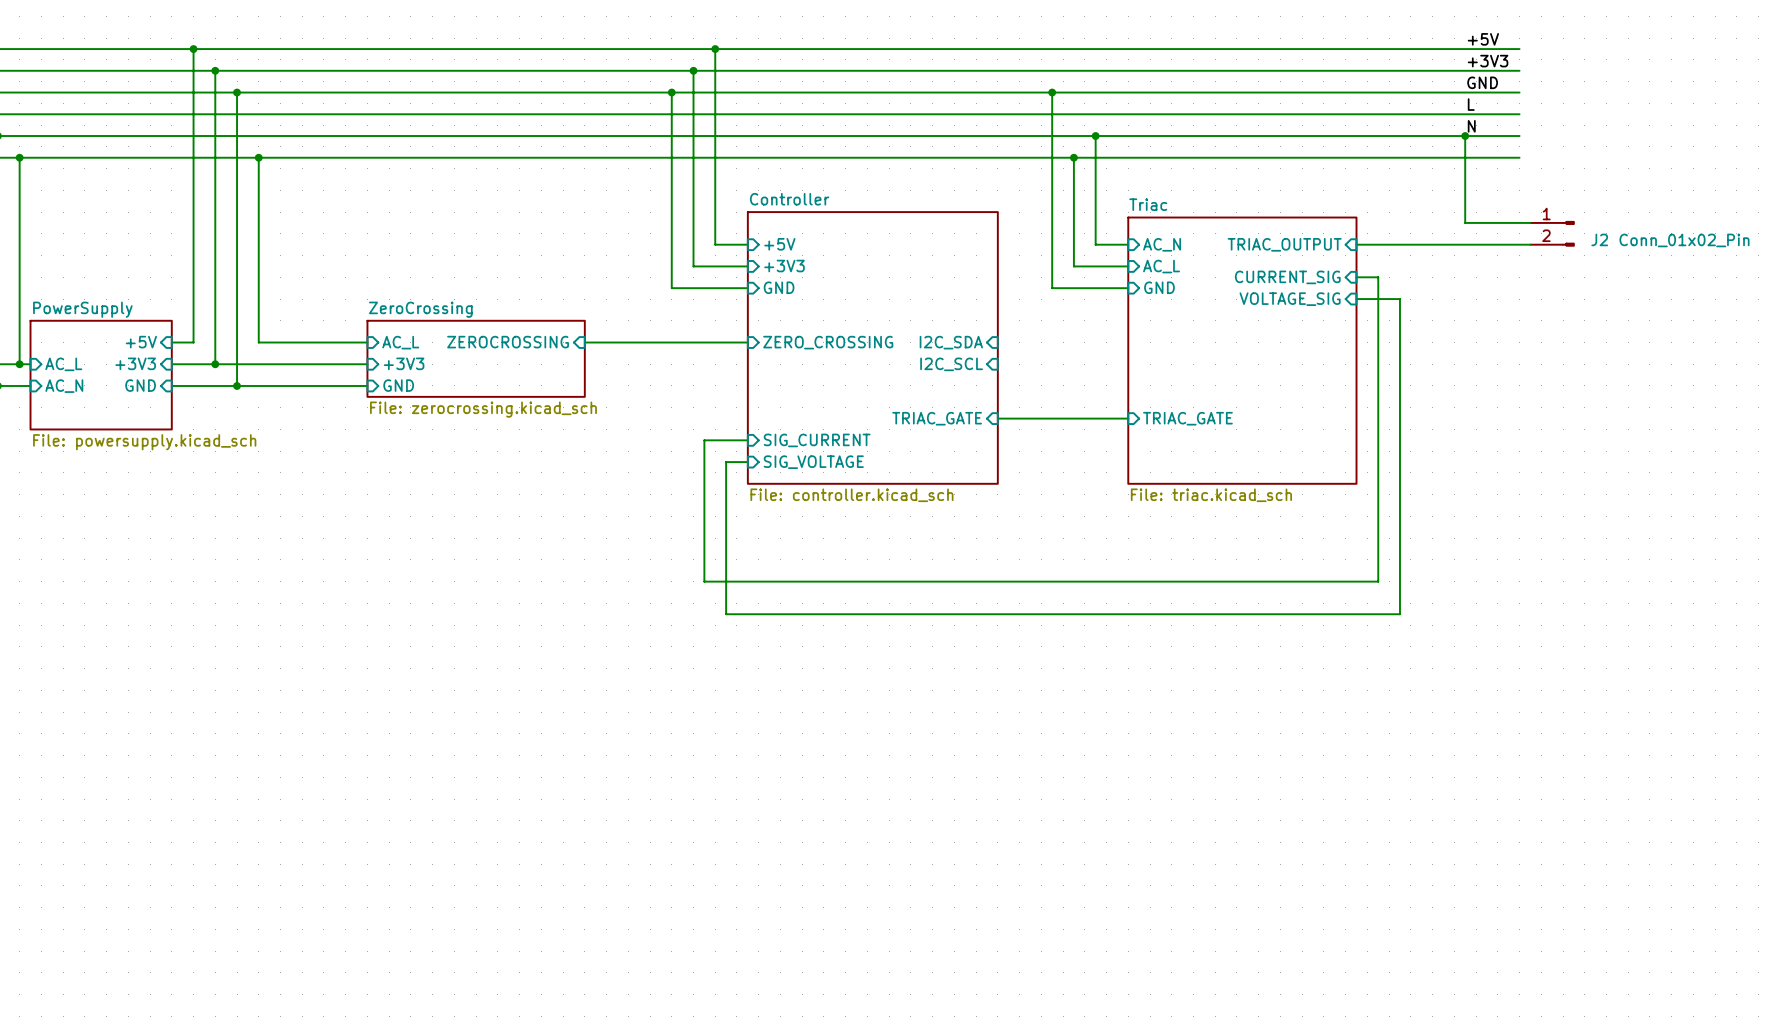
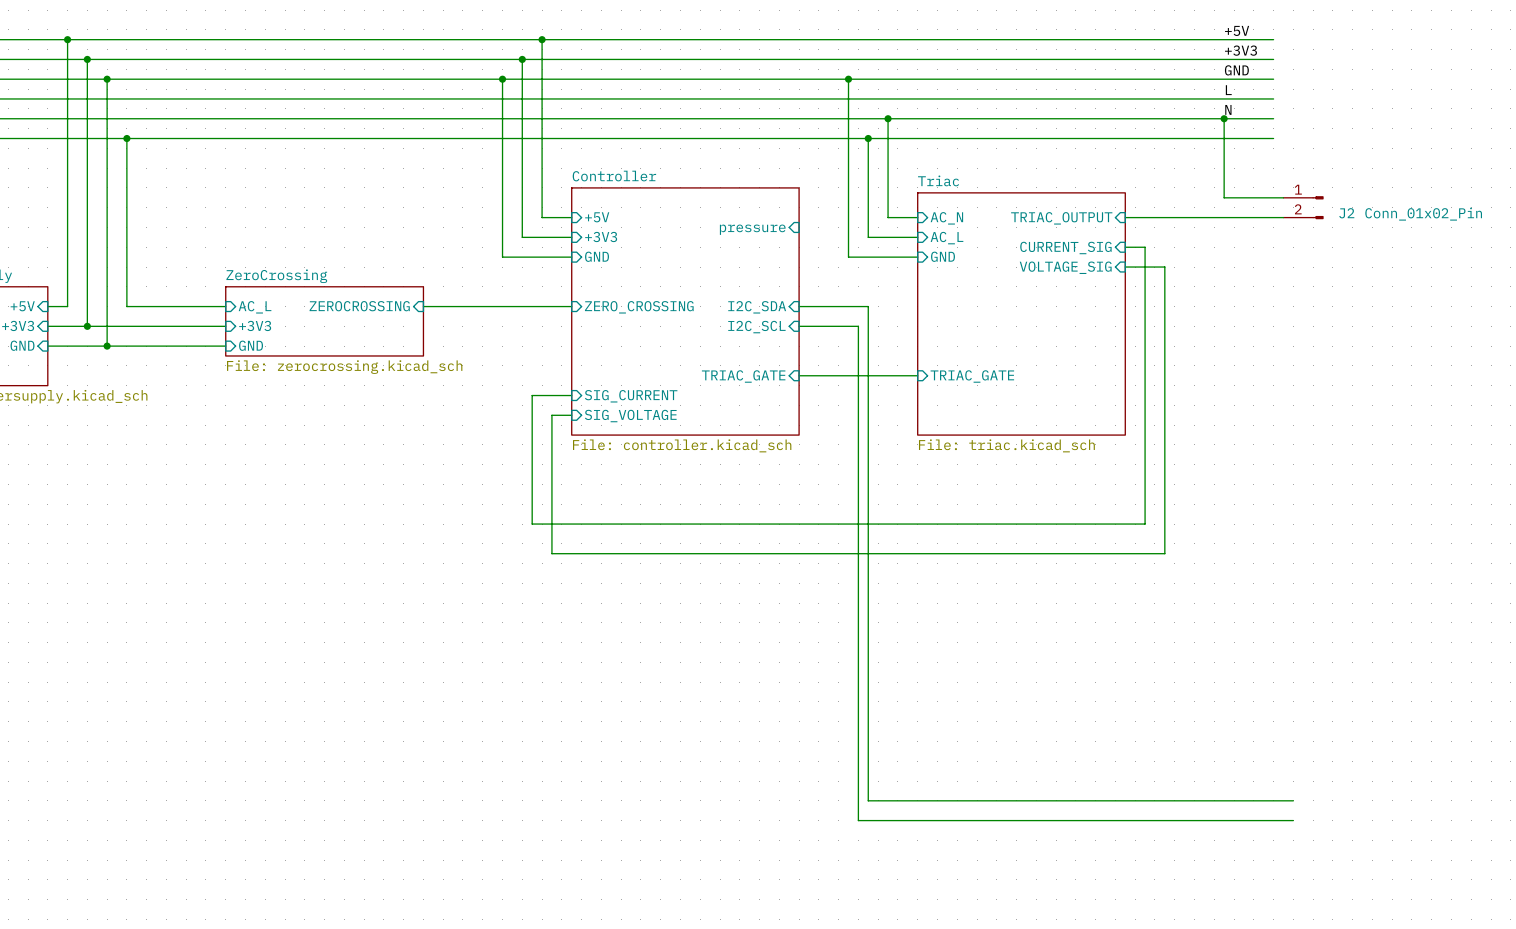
sheet pin: none -> pressure (752, 229)
wire: none -> (799, 306) (868, 306) (868, 800) (1293, 800)
wire: none -> (799, 326) (858, 326) (858, 820) (1293, 820)

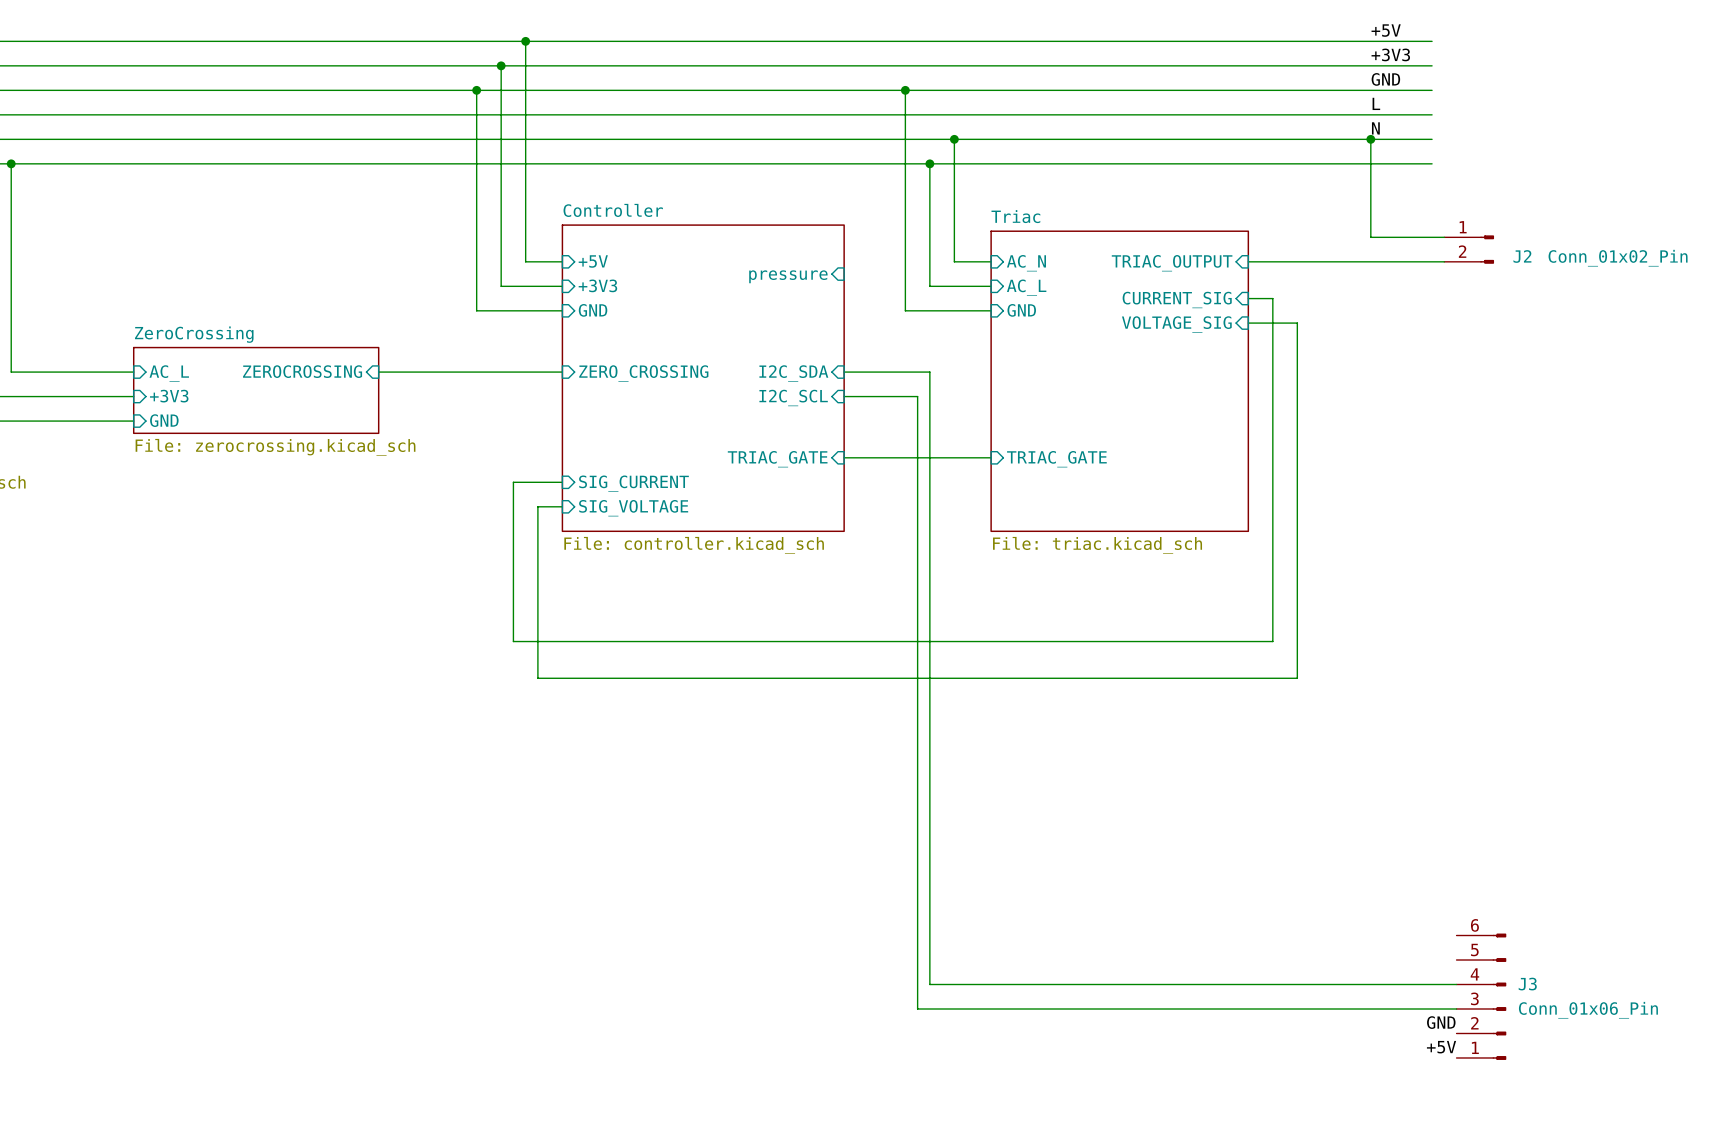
J3: none -> Conn_01x06_Pin (1481, 996)
label: none -> GND (1441, 1022)
label: none -> +5V (1441, 1047)

